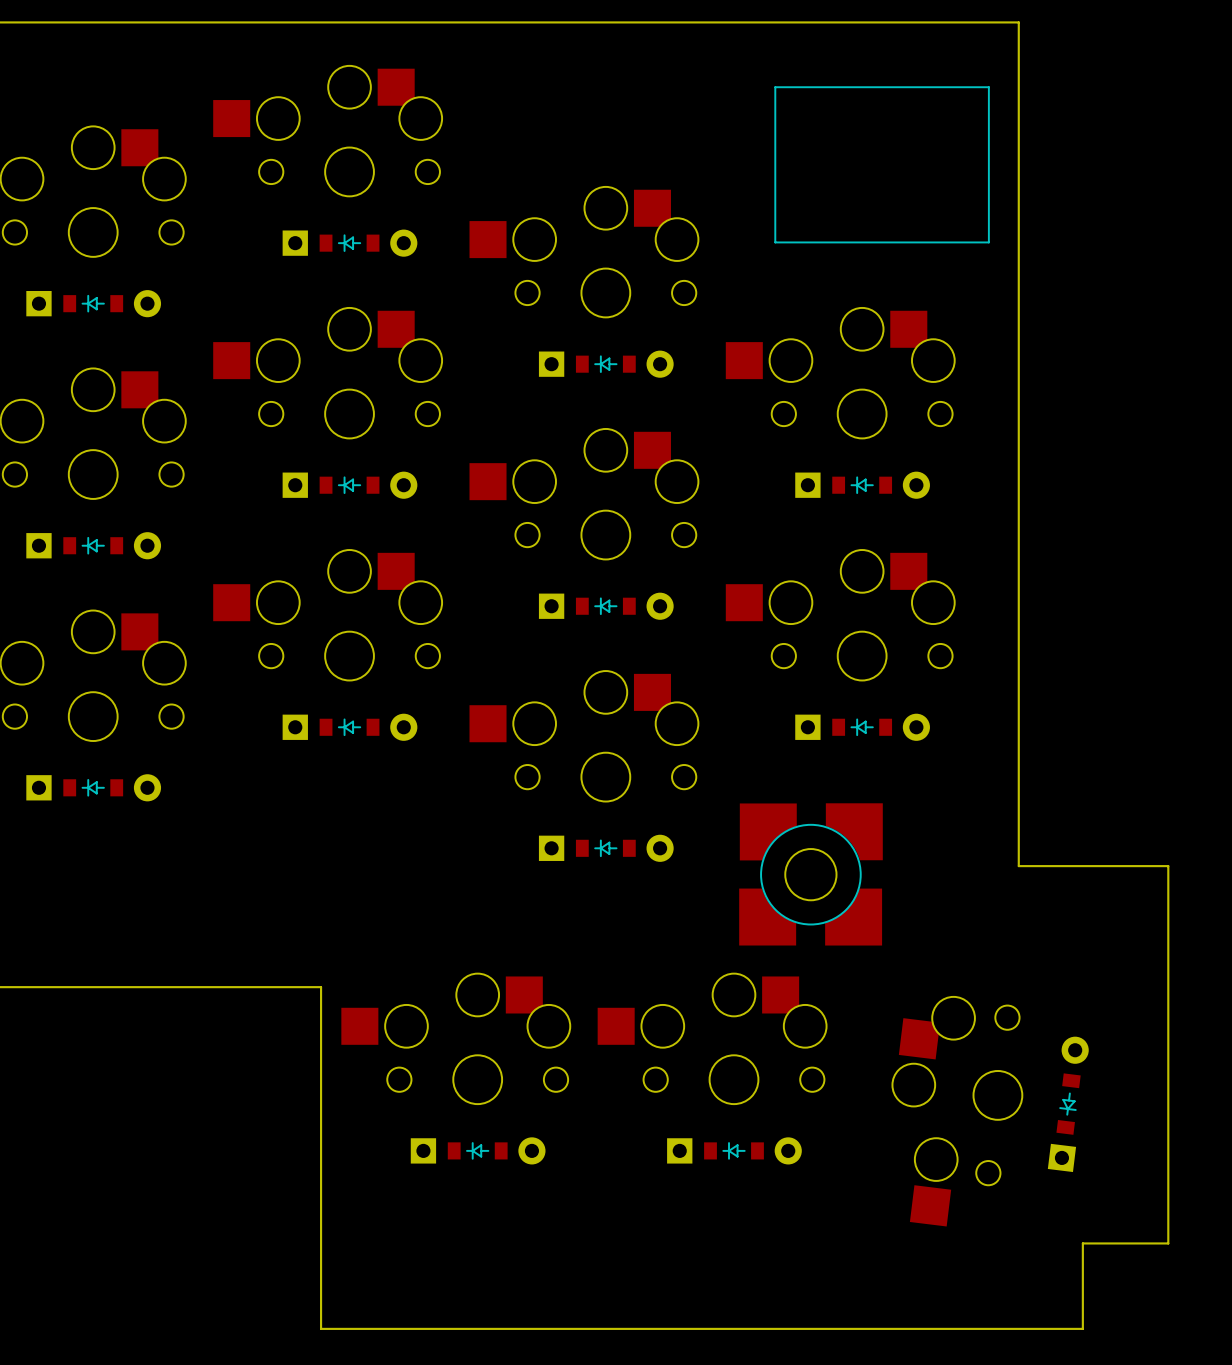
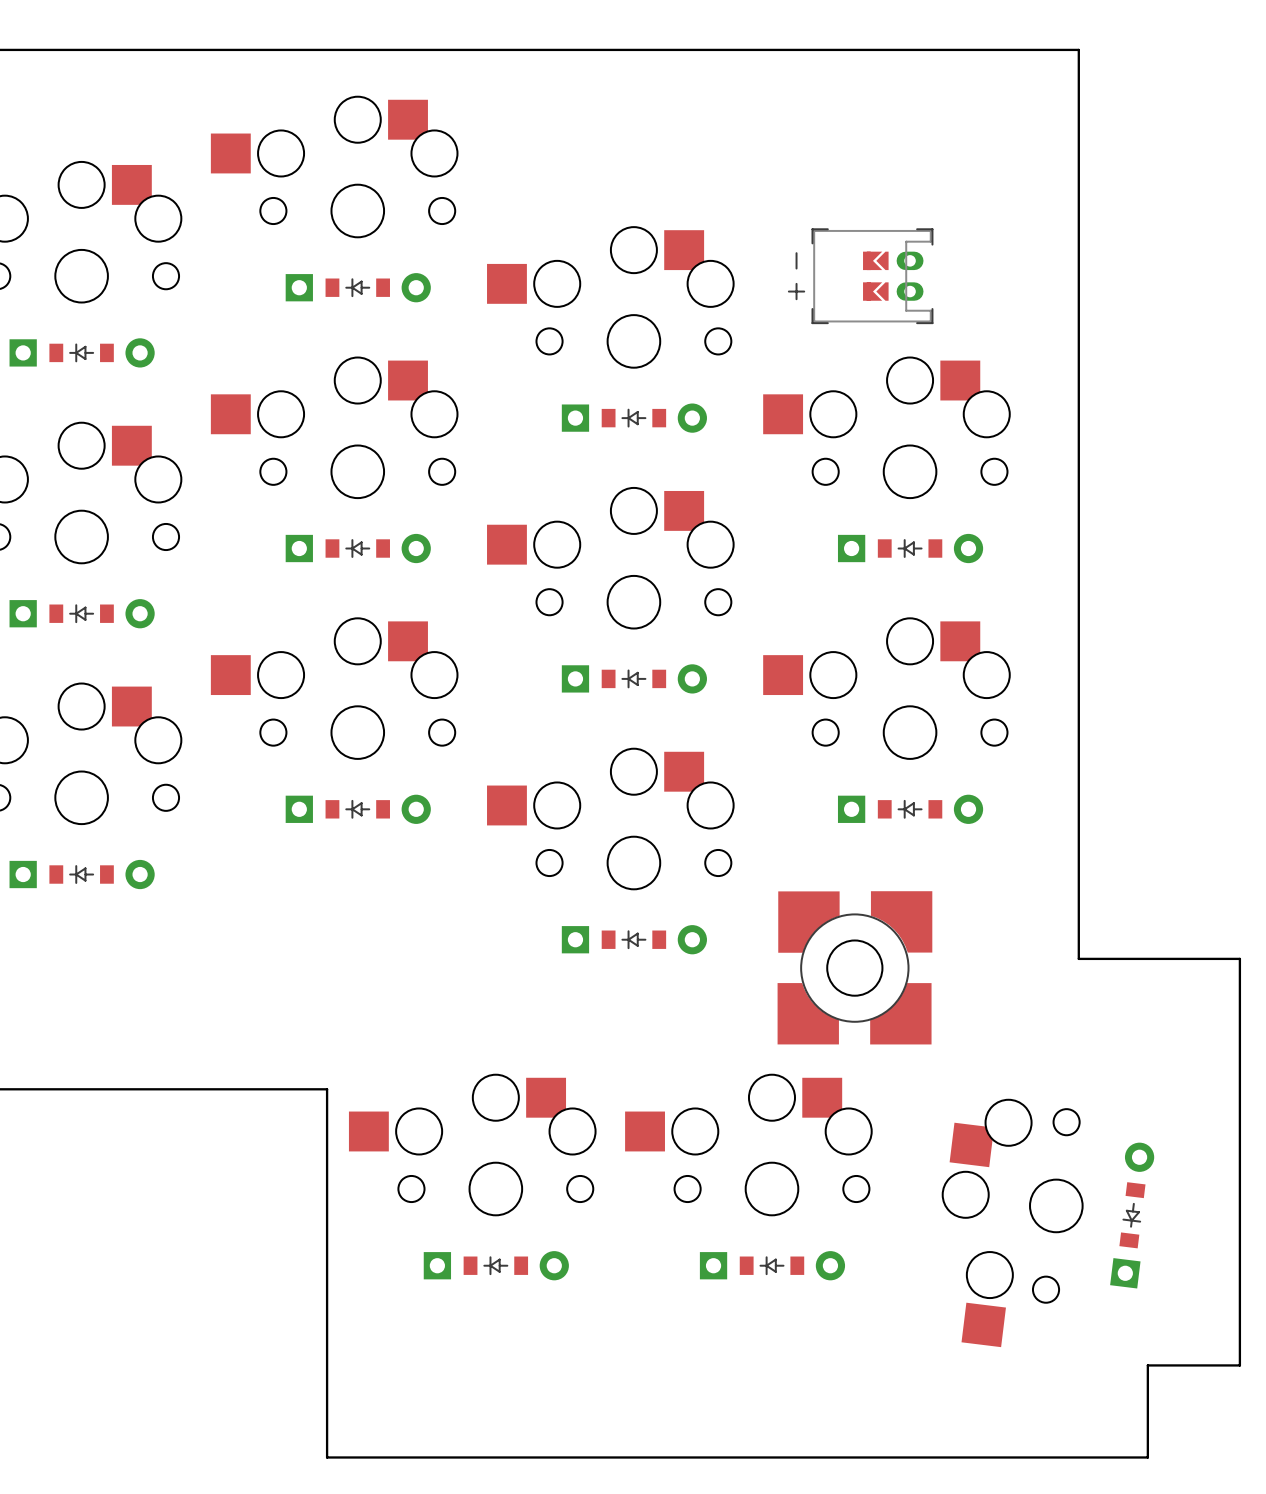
line: (775, 87) (988, 87) (988, 242) (775, 242) (775, 87) -> none
part: none -> (860, 276)

